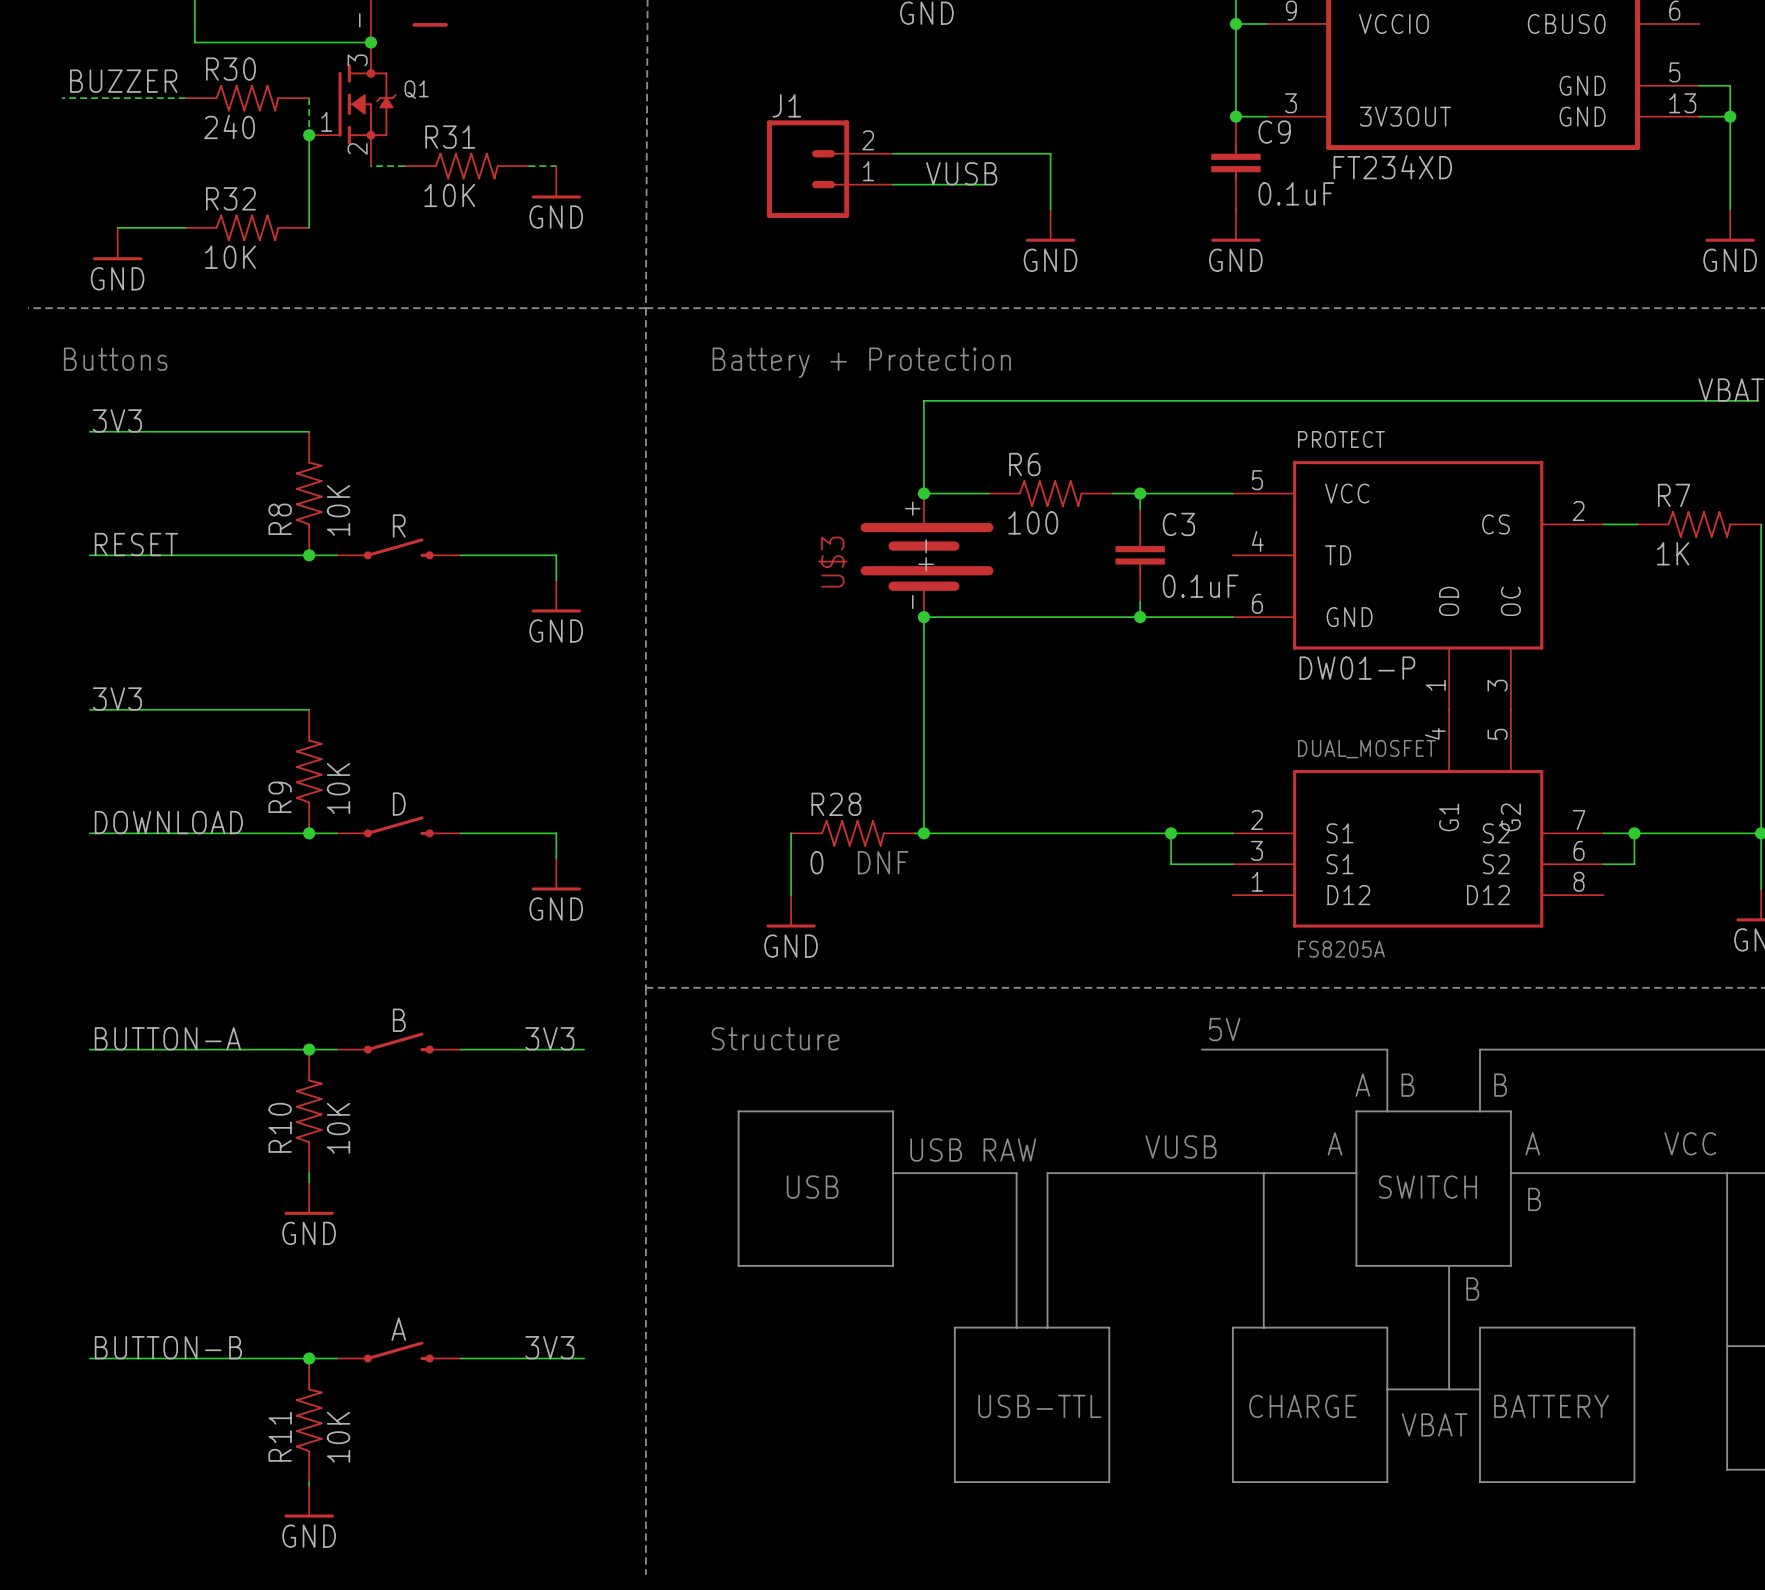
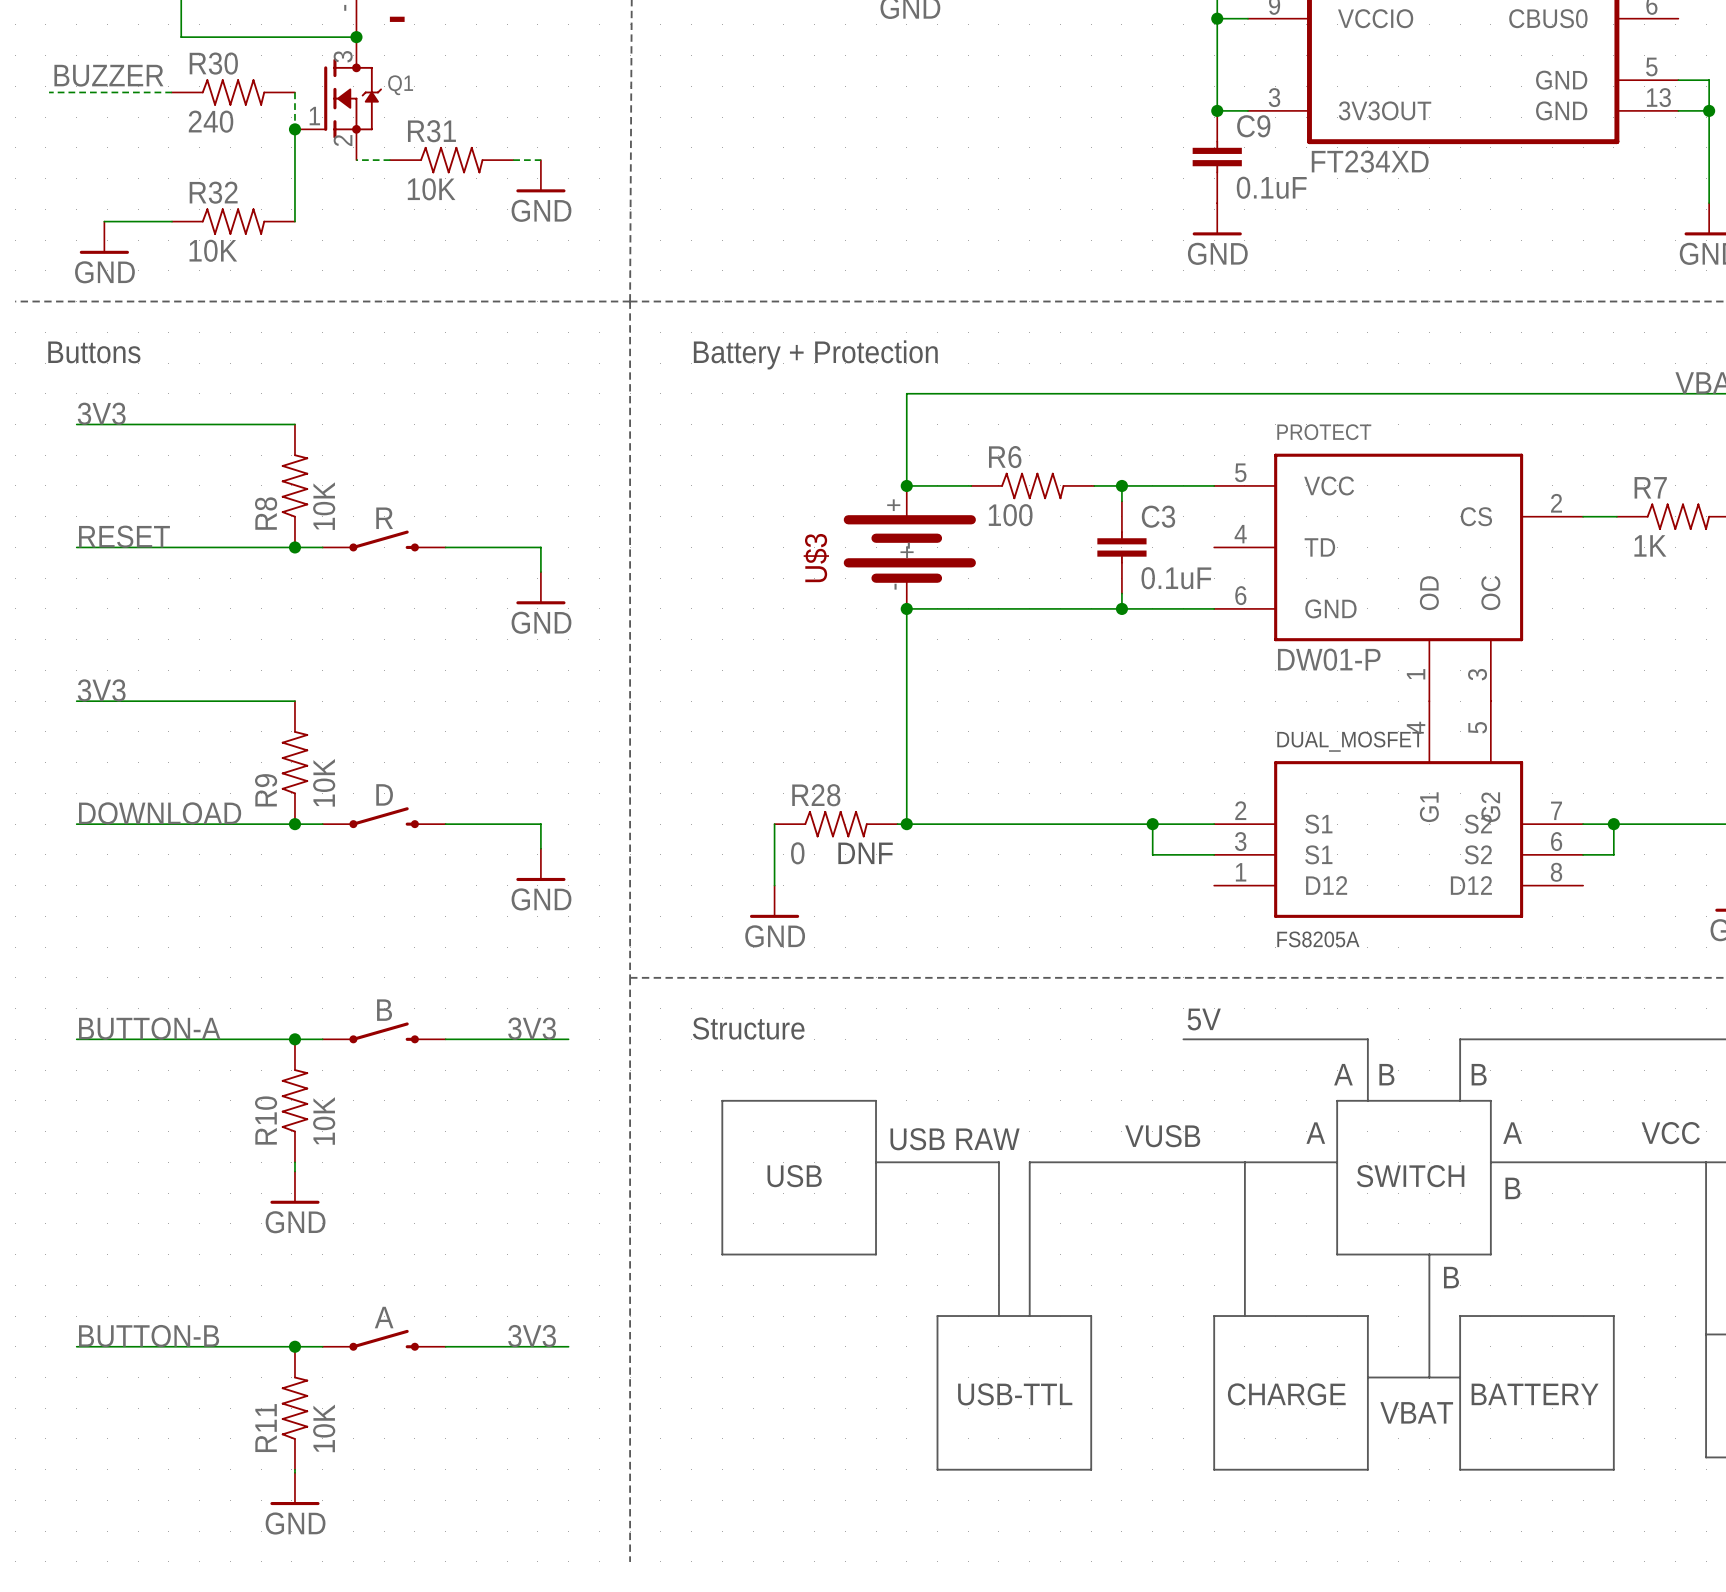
wire: (893, 153) (1050, 153) (1050, 209) -> none
J1: (830, 169) -> none
label: VUSB (961, 173) -> none
wire: (893, 184) (985, 184) -> none
power symbol: GND (1050, 225) -> none

